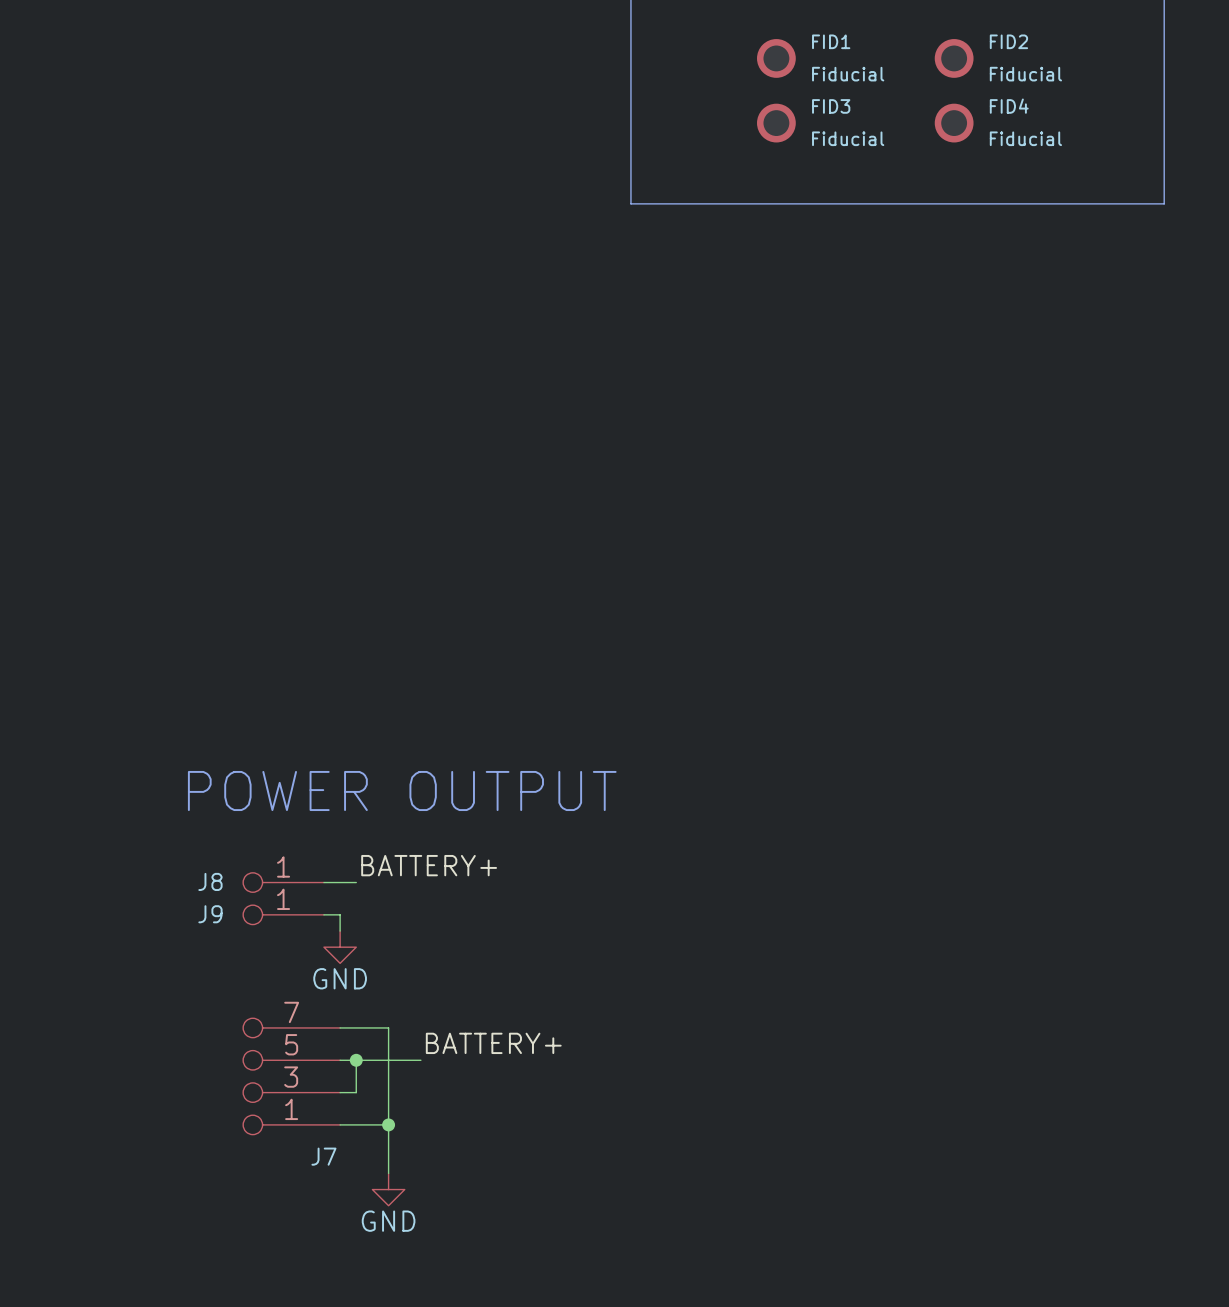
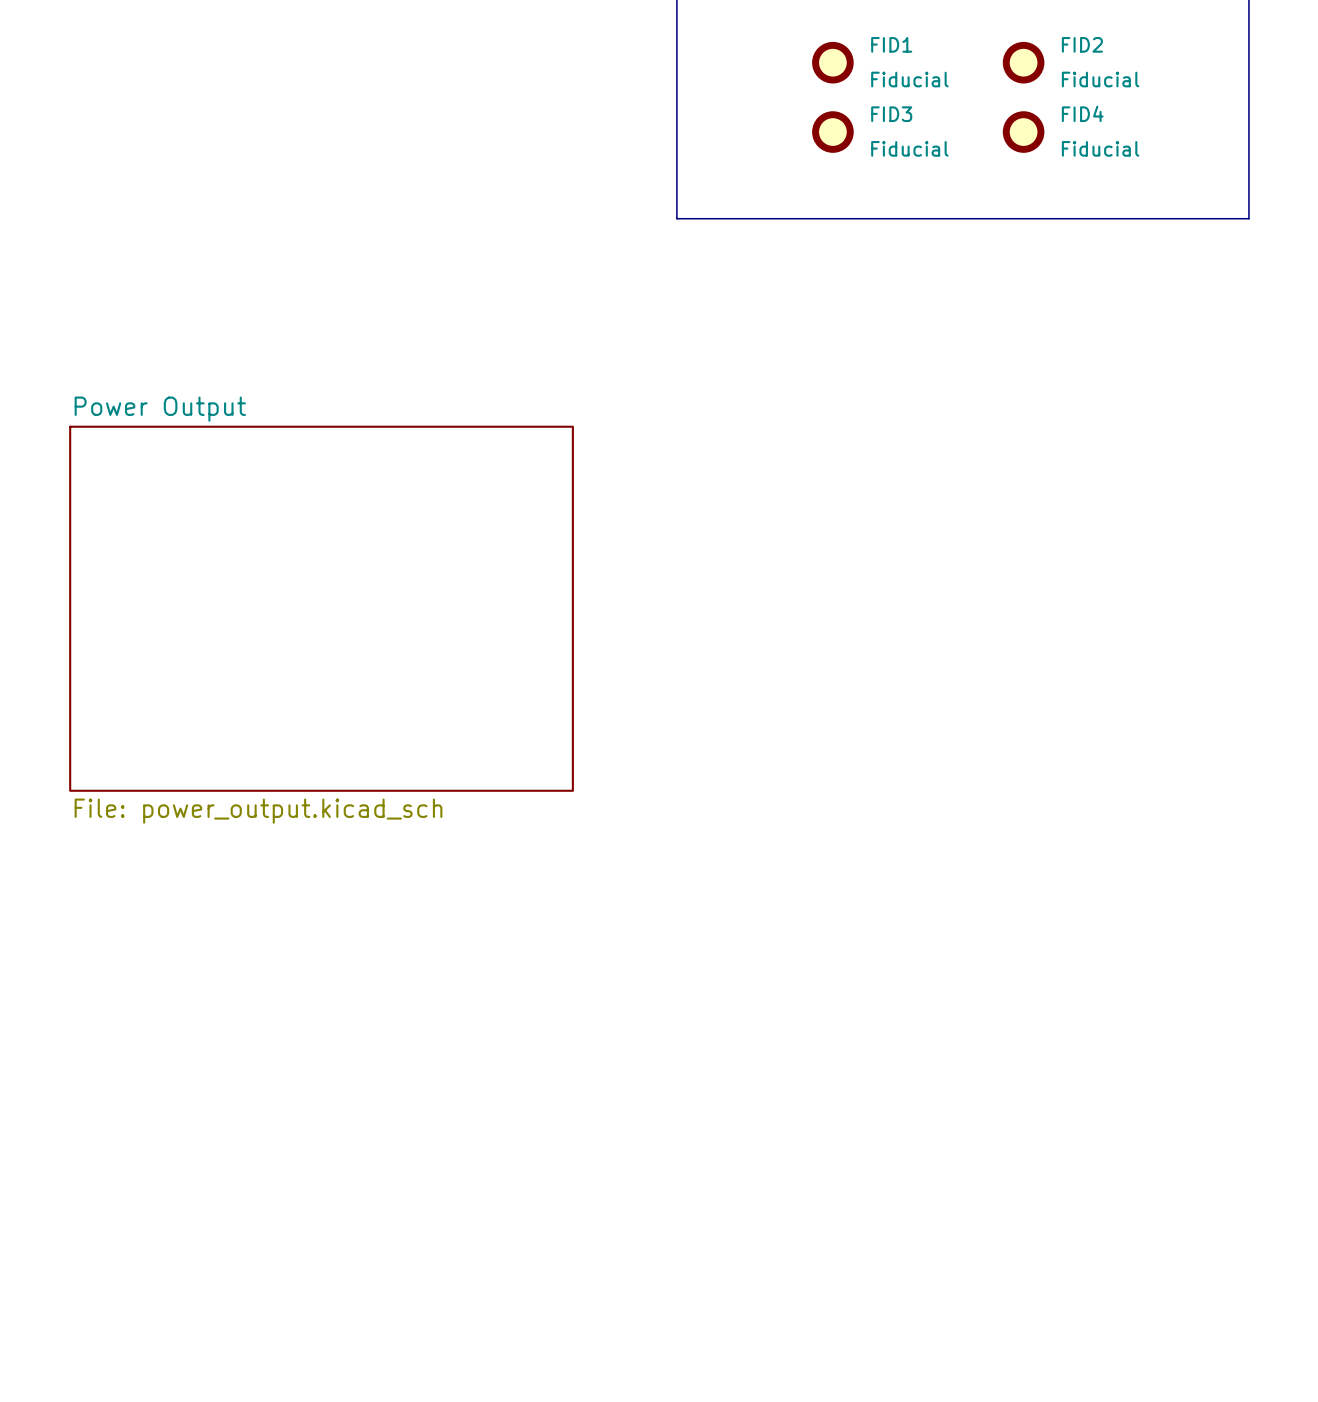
sheet Power Output: none -> File: power_output.kicad_sch (321, 608)
text: POWER OUTPUT (402, 790) -> none
label: BATTERY+ (429, 865) -> none
J8: (283, 882) -> none
wire: (323, 882) (356, 882) -> none
J9: (283, 914) -> none
wire: (323, 914) (340, 914) (340, 931) -> none
power symbol: GND (340, 947) -> none
wire: (340, 1027) (388, 1027) (388, 1173) -> none
label: BATTERY+ (493, 1043) -> none
wire: (340, 1060) (420, 1060) -> none
wire: (356, 1060) (356, 1092) (340, 1092) -> none
junction: (356, 1060) -> none
J7: (291, 1076) -> none
wire: (340, 1124) (388, 1124) -> none
junction: (388, 1124) -> none
power symbol: GND (388, 1189) -> none

